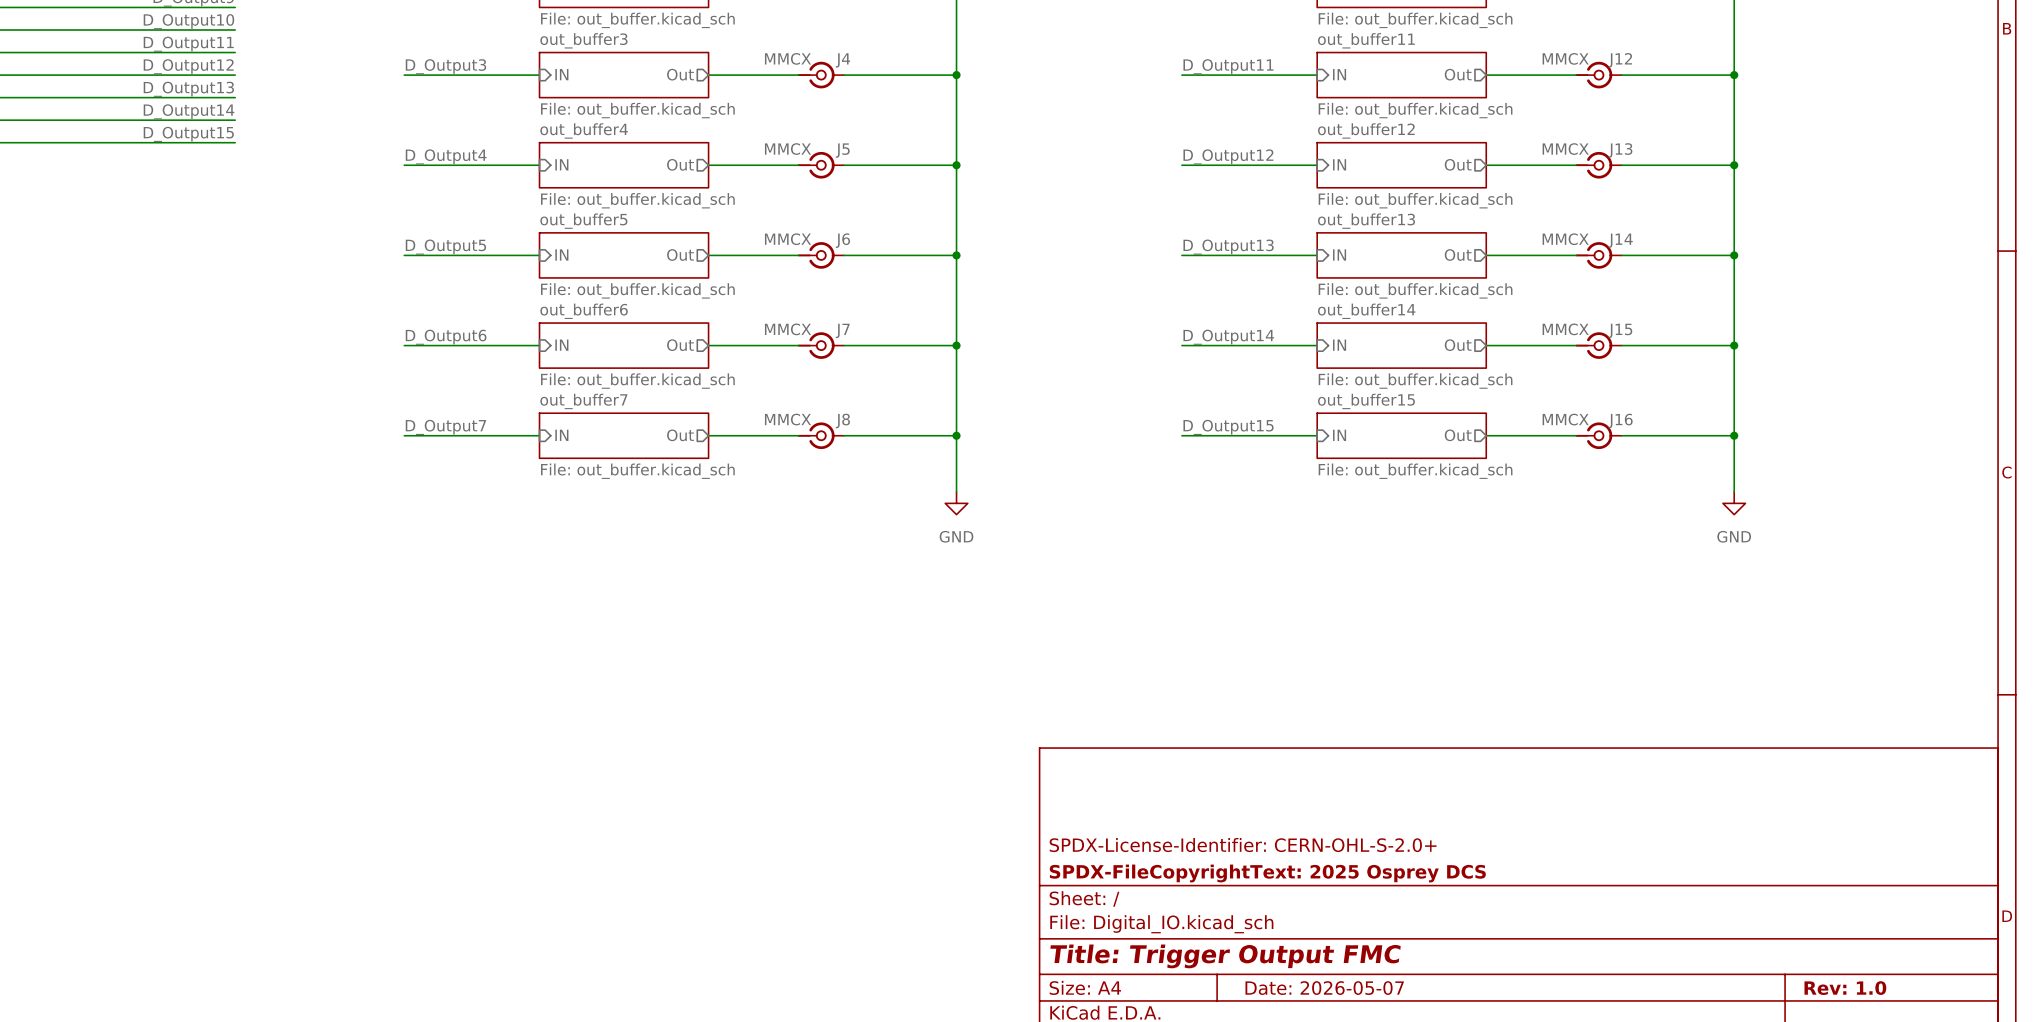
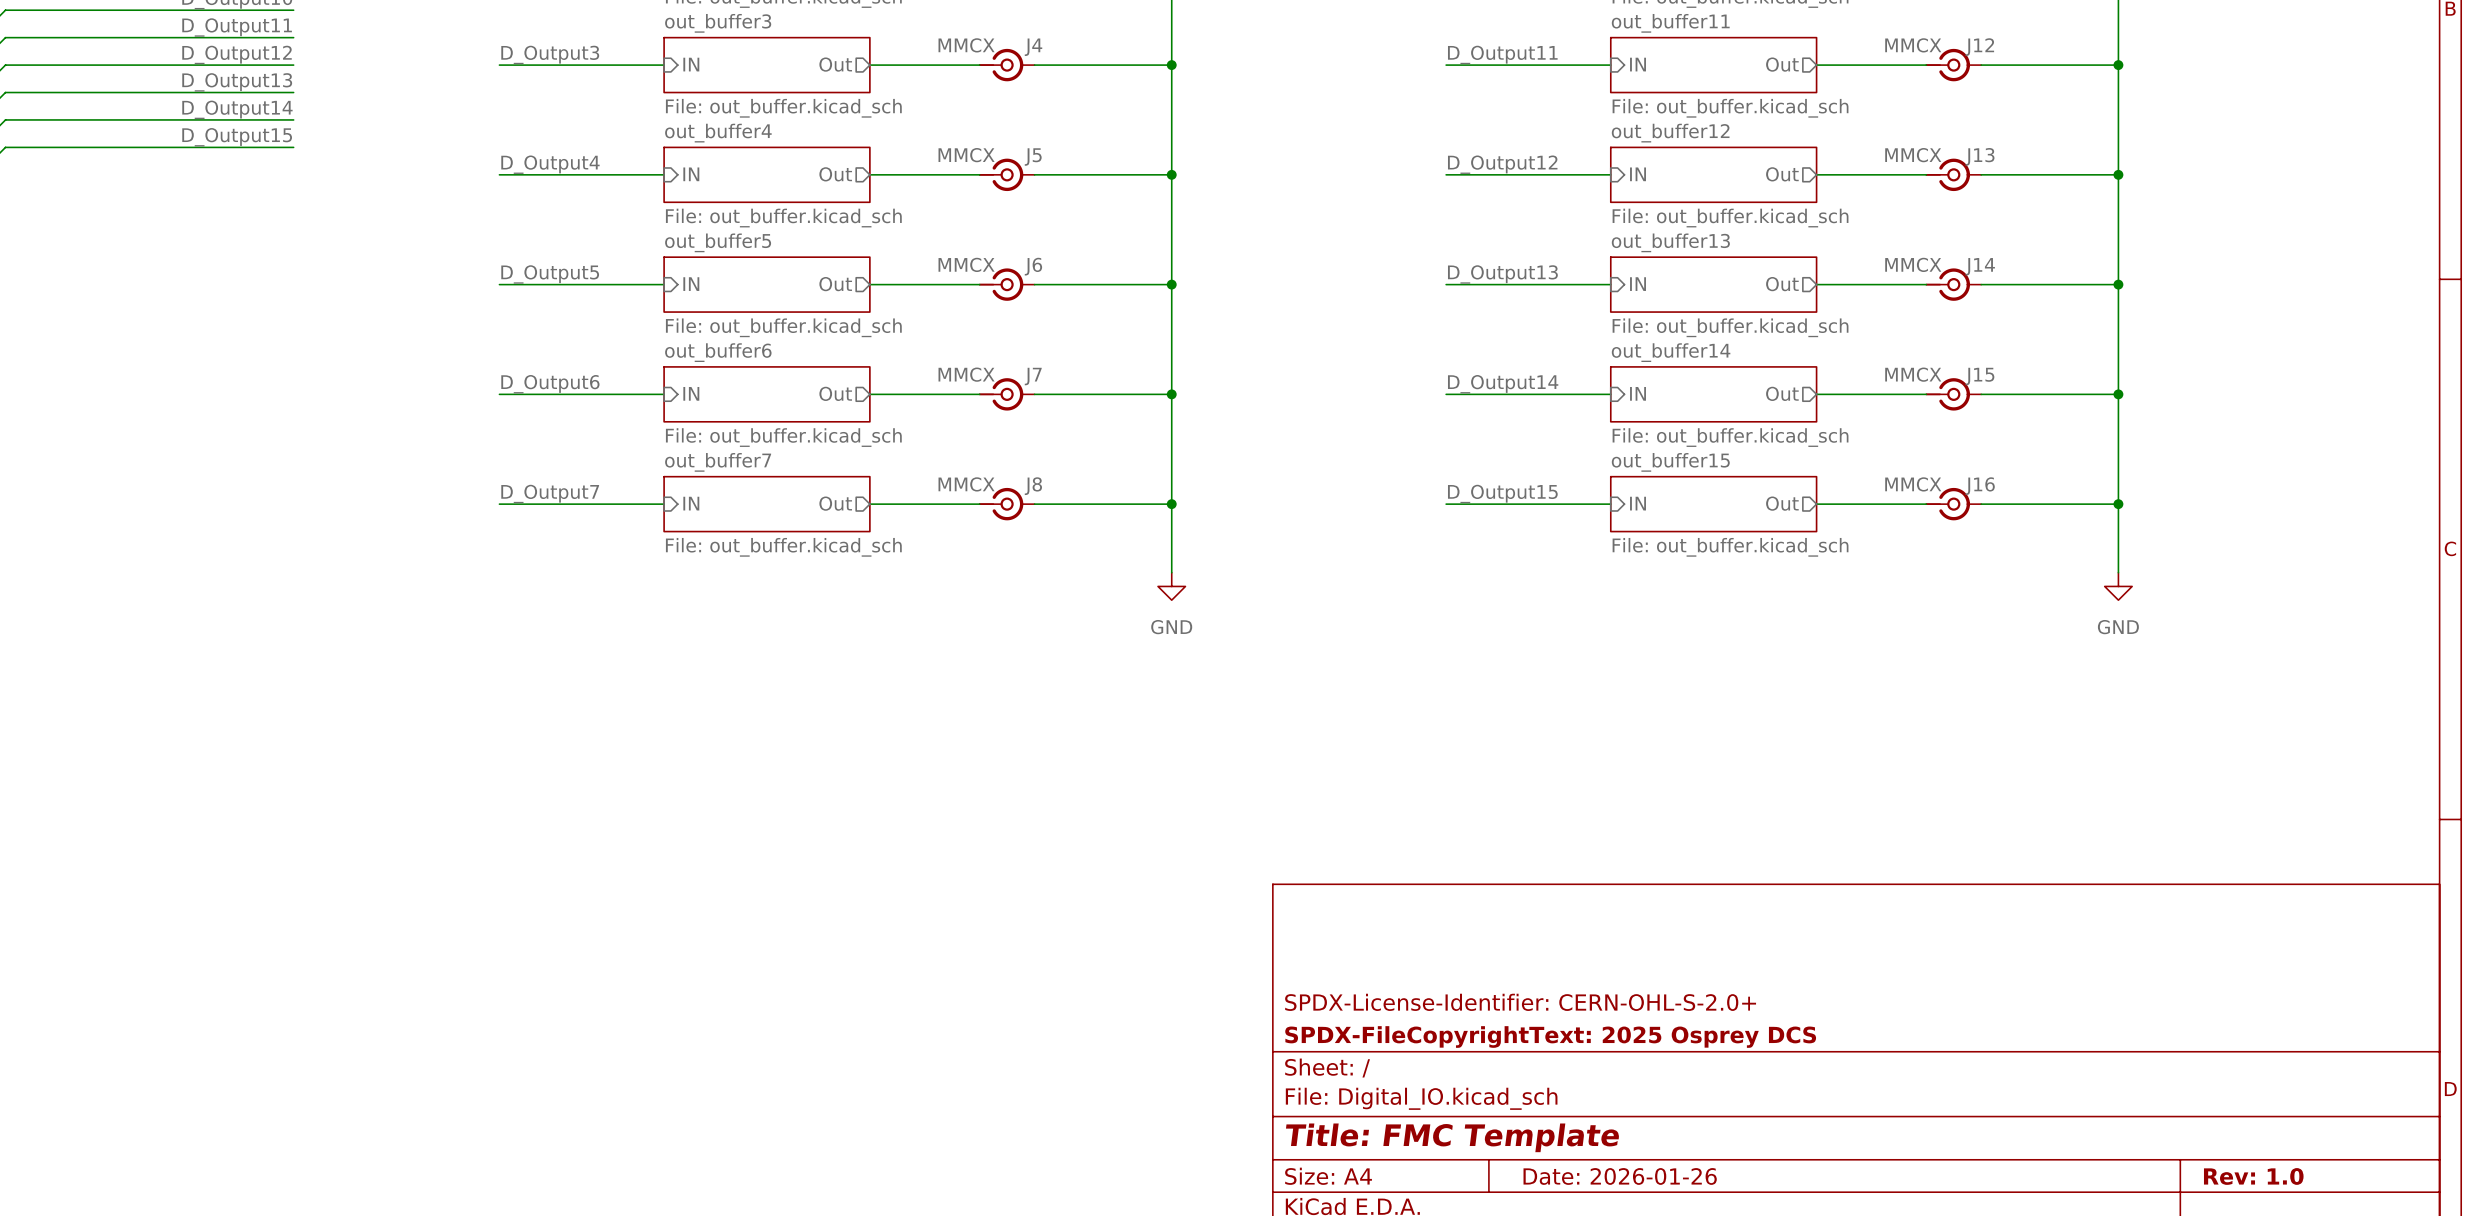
title block: Title: Trigger Output FMC (1225, 956) -> Title: FMC Template (1452, 1137)
title block: Date: 2026-05-07 (1324, 988) -> Date: 2026-01-26 (1620, 1176)

